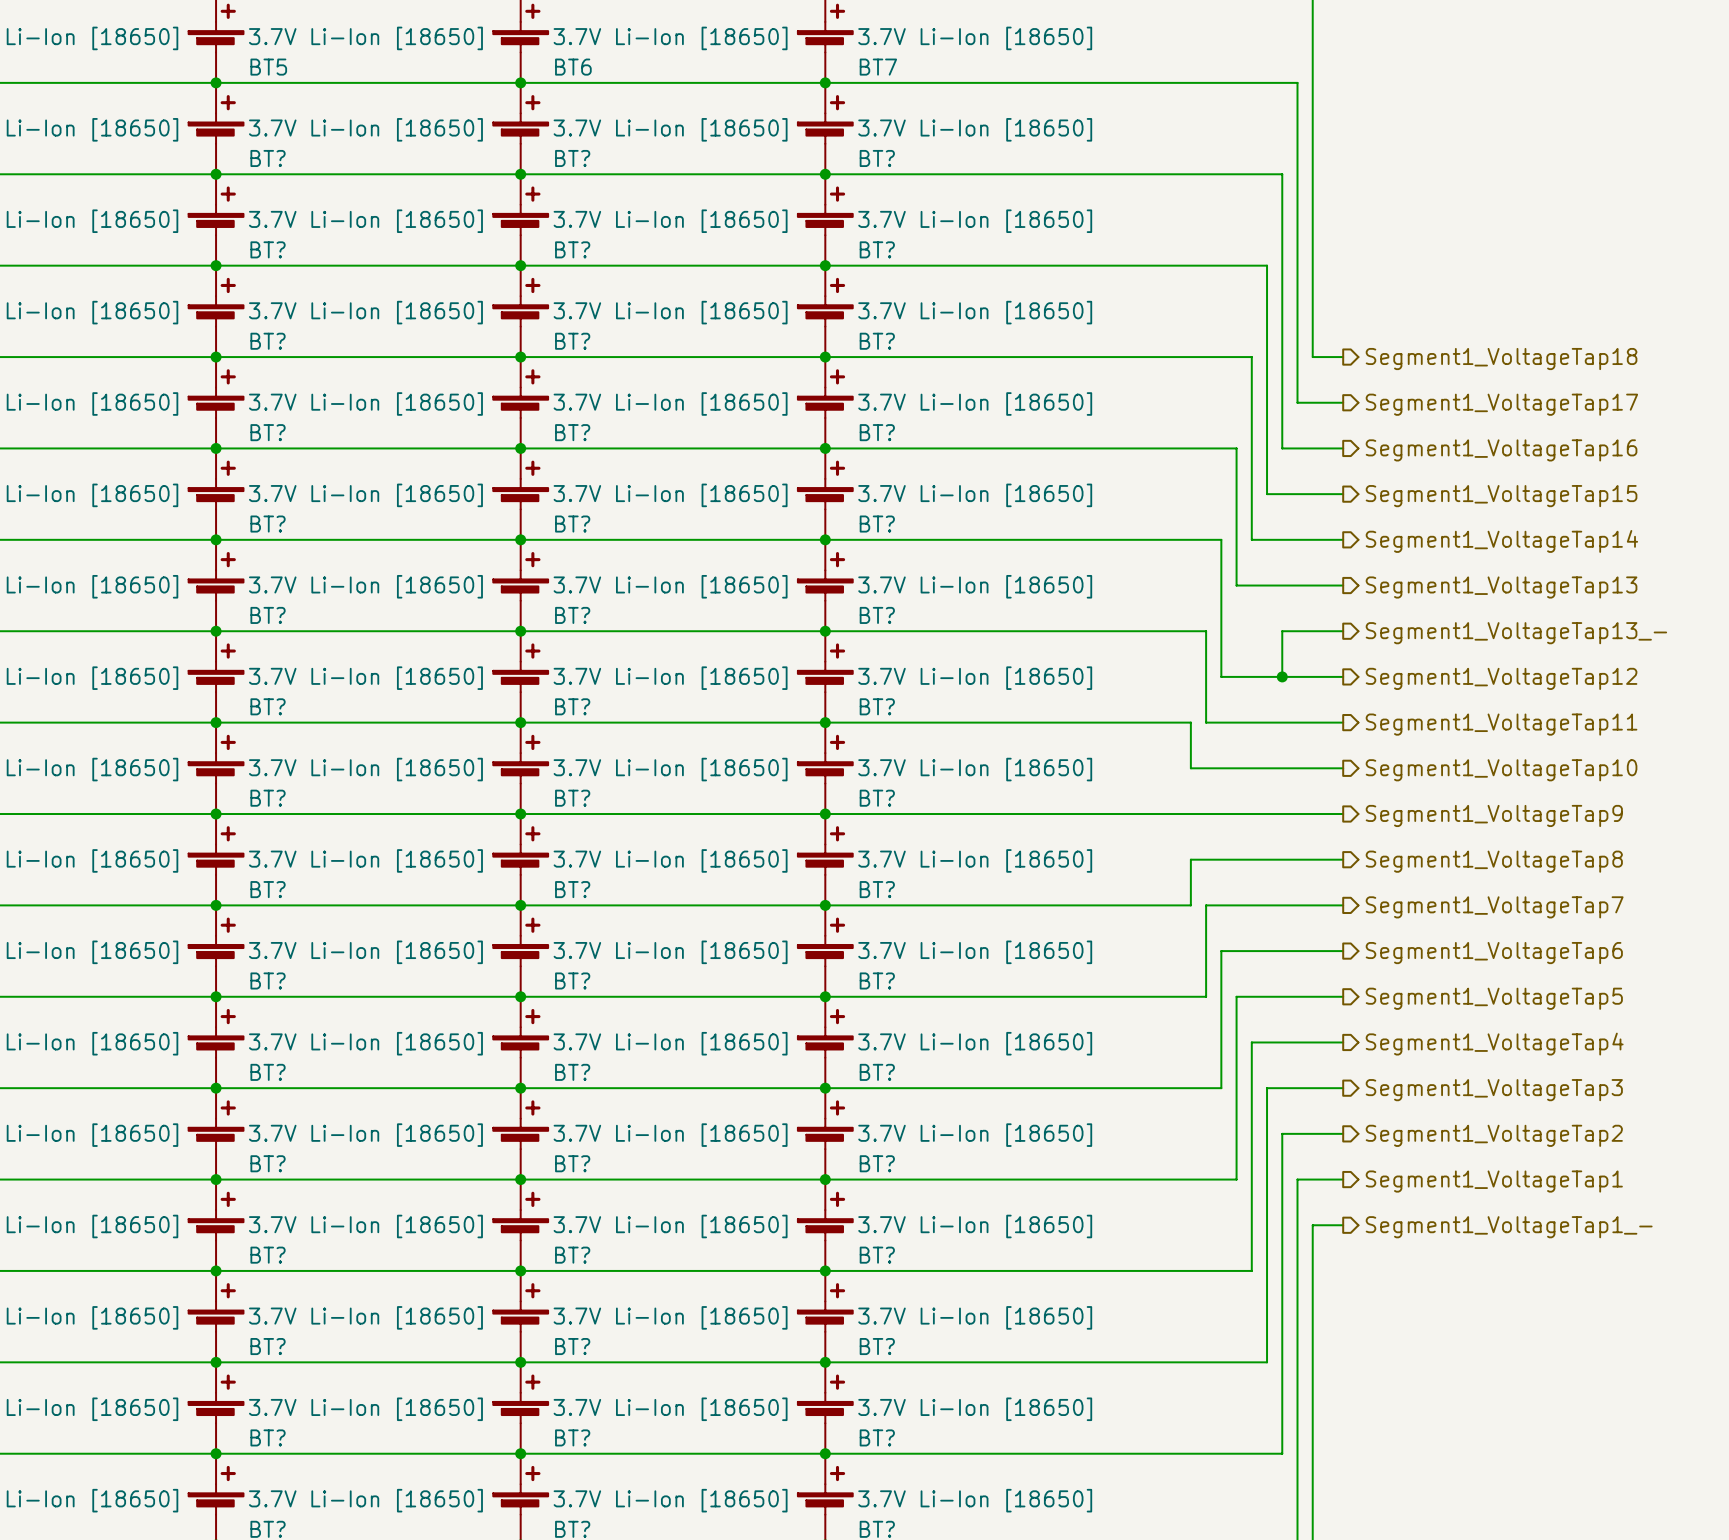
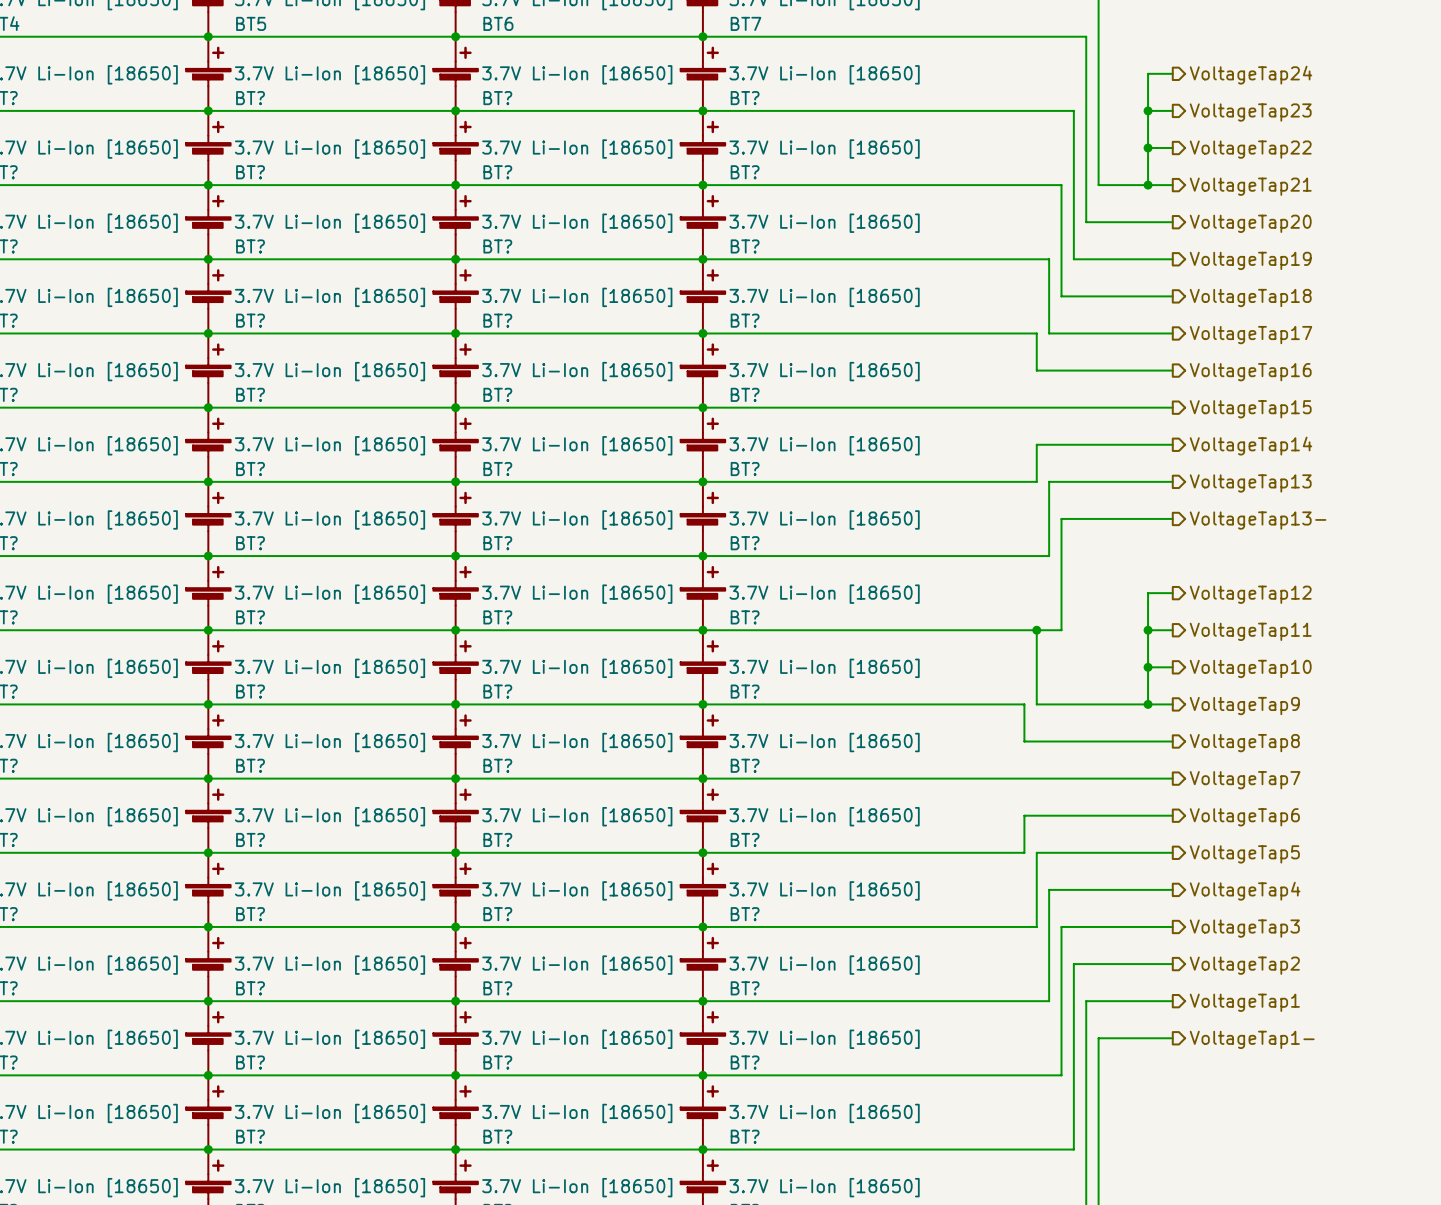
wire: none -> (1172, 73) (1148, 73) (1148, 185)
hierarchical label: none -> VoltageTap24 (1250, 75)
wire: none -> (1148, 110) (1172, 110)
junction: none -> (1148, 110)
hierarchical label: none -> VoltageTap23 (1250, 112)
wire: none -> (1148, 148) (1172, 148)
junction: none -> (1148, 148)
hierarchical label: none -> VoltageTap22 (1250, 149)
wire: (1312, 265) (1312, 357) -> (1073, 259) (1098, 259)
wire: none -> (1098, 185) (1172, 185)
junction: none -> (1148, 185)
hierarchical label: none -> VoltageTap21 (1250, 186)
wire: (1297, 311) (1297, 402) -> (1061, 296) (1086, 296)
wire: none -> (1086, 222) (1172, 222)
hierarchical label: none -> VoltageTap20 (1250, 223)
wire: (1282, 357) (1282, 448) -> (1049, 333) (1073, 333)
wire: none -> (1123, 259) (1172, 259)
hierarchical label: Segment1_VoltageTap18 (1501, 359) -> VoltageTap19 (1250, 260)
wire: (1267, 402) (1267, 494) -> (1036, 370) (1061, 370)
wire: none -> (1123, 296) (1172, 296)
hierarchical label: Segment1_VoltageTap17 (1501, 404) -> VoltageTap18 (1250, 297)
wire: (1251, 448) (1251, 539) -> (1024, 407) (1049, 407)
wire: none -> (1123, 333) (1172, 333)
hierarchical label: Segment1_VoltageTap16 (1501, 450) -> VoltageTap17 (1250, 335)
wire: (1236, 494) (1236, 585) -> (1012, 481) (1036, 481) (1036, 444)
wire: none -> (1123, 370) (1172, 370)
hierarchical label: Segment1_VoltageTap15 (1501, 496) -> VoltageTap16 (1250, 372)
wire: (1221, 539) (1221, 676) (1267, 676) -> none
wire: none -> (1123, 407) (1172, 407)
hierarchical label: Segment1_VoltageTap14 (1501, 541) -> VoltageTap15 (1250, 409)
wire: none -> (1123, 444) (1172, 444)
hierarchical label: Segment1_VoltageTap13 (1501, 587) -> VoltageTap14 (1250, 446)
wire: (1206, 631) (1206, 722) -> (999, 556) (1012, 556)
wire: (1282, 631) (1282, 676) -> (1073, 481) (1049, 481) (1049, 556)
wire: none -> (1123, 481) (1172, 481)
hierarchical label: Segment1_VoltageTap13_- (1516, 633) -> VoltageTap13 (1250, 483)
junction: (1282, 676) -> none
wire: none -> (1123, 518) (1172, 518)
hierarchical label: Segment1_VoltageTap12 (1501, 678) -> VoltageTap13- (1258, 520)
wire: (1190, 722) (1190, 768) (1343, 768) -> none
wire: (1251, 722) (1343, 722) -> none
hierarchical label: Segment1_VoltageTap11 (1501, 724) -> none
wire: none -> (1172, 593) (1148, 593) (1148, 704)
hierarchical label: Segment1_VoltageTap10 (1501, 770) -> VoltageTap12 (1250, 594)
junction: none -> (1036, 630)
wire: (1267, 814) (1343, 814) -> (1061, 630) (1061, 518)
wire: none -> (1148, 630) (1172, 630)
junction: none -> (1148, 630)
hierarchical label: Segment1_VoltageTap9 (1494, 815) -> VoltageTap11 (1250, 631)
wire: (1343, 859) (1190, 859) (1190, 905) -> none
wire: none -> (1148, 667) (1172, 667)
junction: none -> (1148, 667)
hierarchical label: Segment1_VoltageTap8 (1494, 861) -> VoltageTap10 (1250, 668)
wire: (1206, 905) (1206, 996) -> (1012, 704) (999, 704)
wire: (1221, 905) (1236, 905) -> (1024, 704) (1024, 741)
wire: none -> (1123, 704) (1172, 704)
junction: none -> (1148, 704)
hierarchical label: Segment1_VoltageTap7 (1494, 907) -> VoltageTap9 (1244, 706)
wire: (1221, 951) (1221, 1042) -> (1036, 630) (1036, 704)
wire: none -> (1123, 741) (1172, 741)
hierarchical label: Segment1_VoltageTap6 (1494, 953) -> VoltageTap8 (1244, 743)
wire: (1236, 996) (1236, 1088) -> (1036, 778) (1012, 778)
wire: none -> (1123, 778) (1172, 778)
hierarchical label: Segment1_VoltageTap5 (1494, 998) -> VoltageTap7 (1245, 780)
wire: (1251, 1042) (1251, 1133) -> (1049, 815) (1024, 815)
wire: none -> (1123, 815) (1172, 815)
hierarchical label: Segment1_VoltageTap4 (1494, 1044) -> VoltageTap6 (1244, 817)
wire: (1267, 1088) (1267, 1179) -> (1061, 852) (1036, 852)
wire: none -> (1123, 852) (1172, 852)
hierarchical label: Segment1_VoltageTap3 (1494, 1090) -> VoltageTap5 (1244, 854)
wire: none -> (1049, 889) (1073, 889)
wire: (1282, 1133) (1282, 1225) -> (1098, 964) (1073, 964)
wire: none -> (1123, 889) (1172, 889)
hierarchical label: Segment1_VoltageTap2 (1494, 1135) -> VoltageTap4 (1245, 891)
wire: (1297, 1179) (1297, 1270) -> (1086, 926) (1061, 926)
wire: none -> (1123, 926) (1172, 926)
hierarchical label: Segment1_VoltageTap1 (1494, 1181) -> VoltageTap3 (1244, 928)
wire: (1312, 1225) (1312, 1316) -> (1172, 1038) (1098, 1038)
wire: none -> (1123, 964) (1172, 964)
hierarchical label: Segment1_VoltageTap1_- (1509, 1227) -> VoltageTap2 (1244, 965)
wire: none -> (1086, 1001) (1172, 1001)
hierarchical label: none -> VoltageTap1 (1244, 1002)
hierarchical label: none -> VoltageTap1- (1252, 1039)

